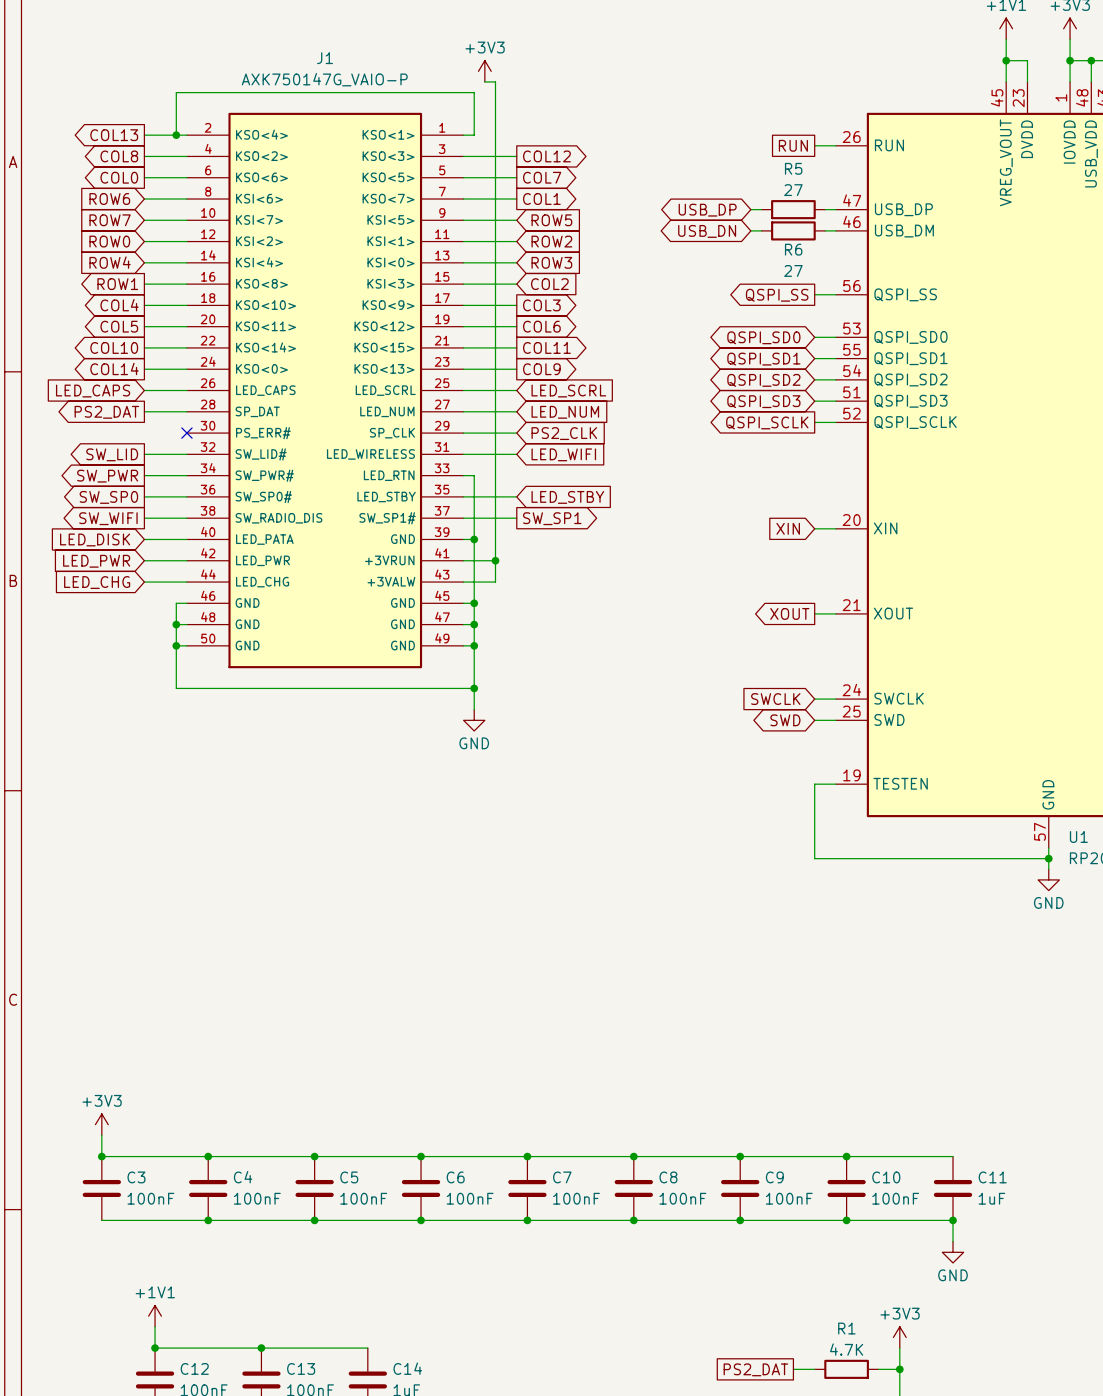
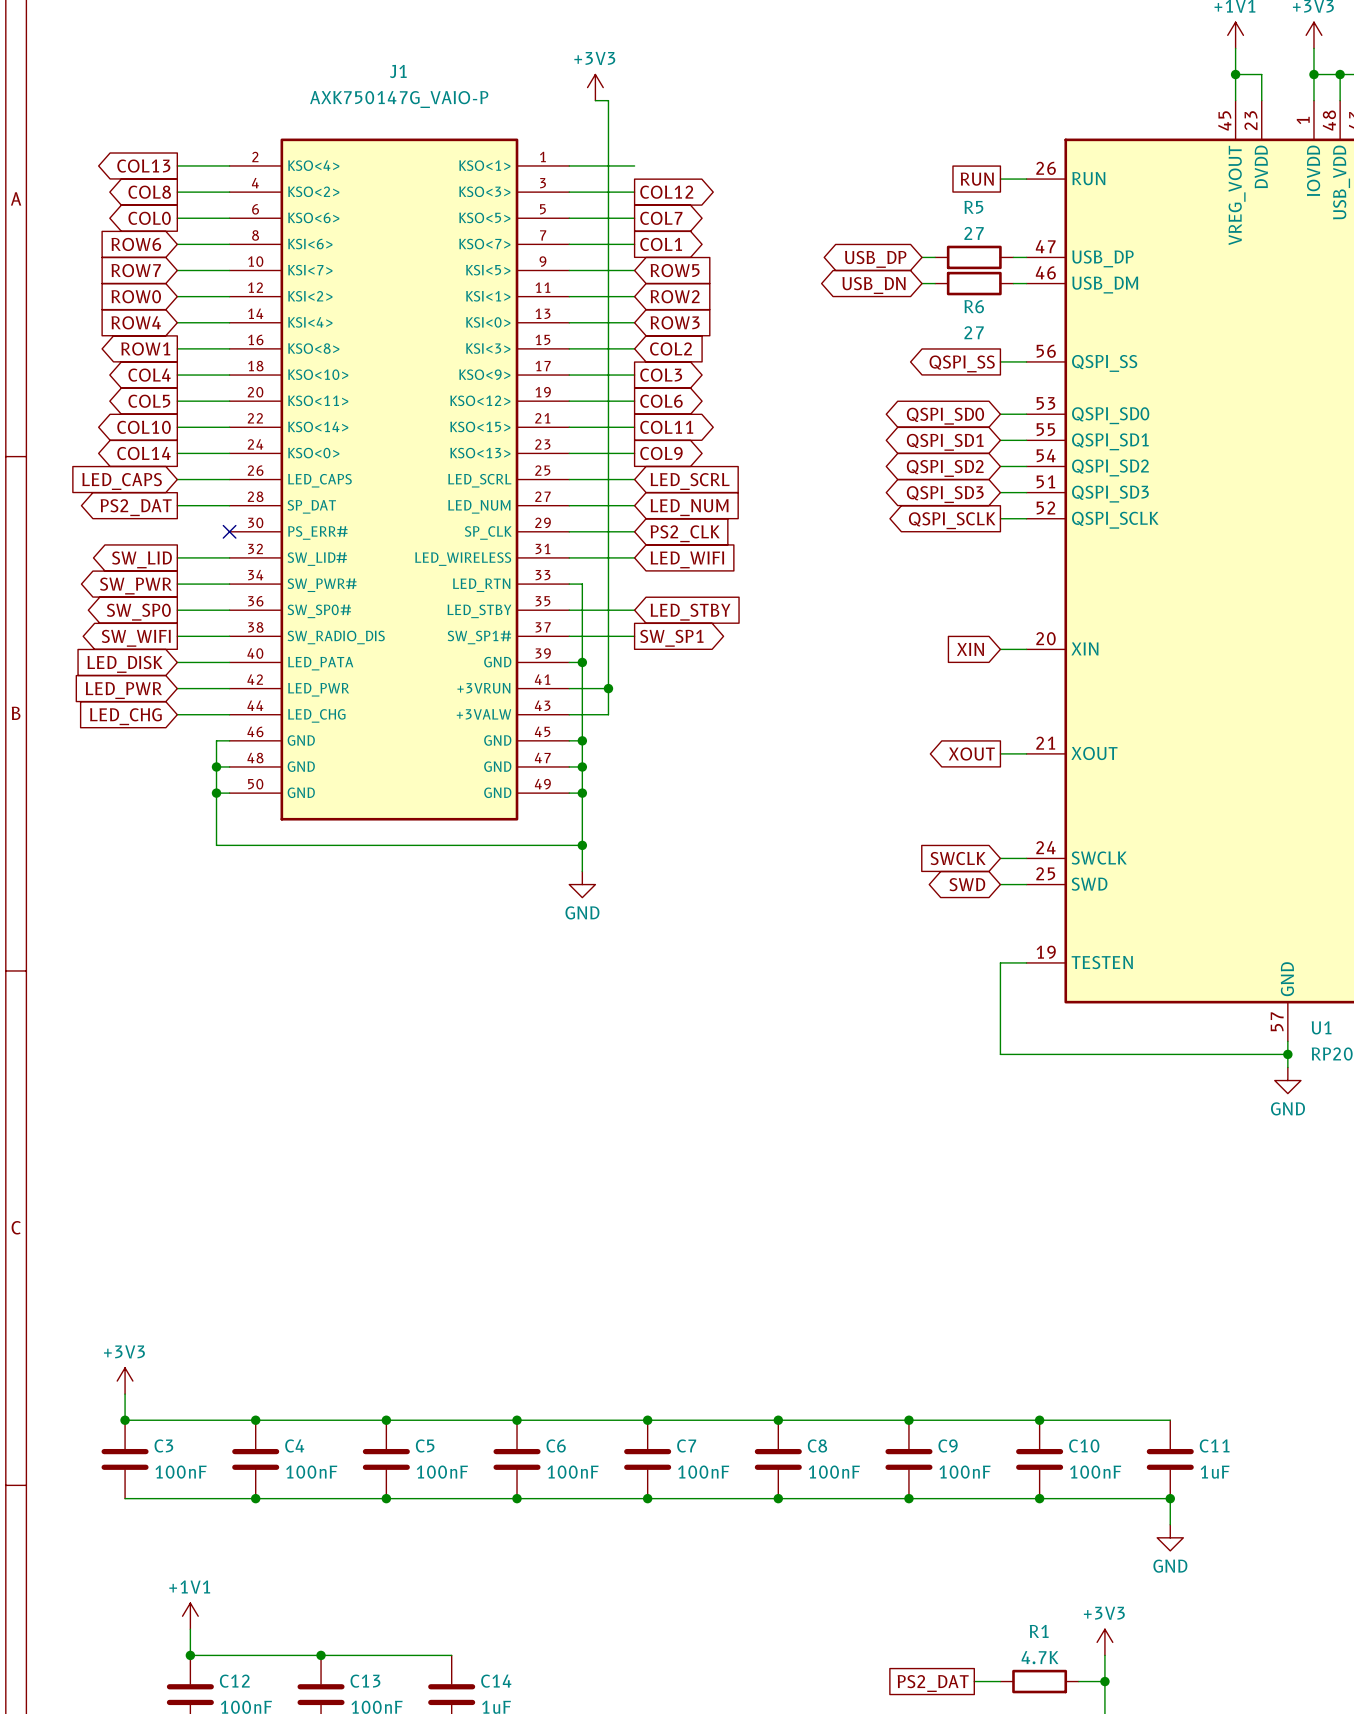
wire: (176, 135) (176, 92) (474, 92) (474, 135) -> (634, 165) (582, 165)
junction: (176, 135) -> none

